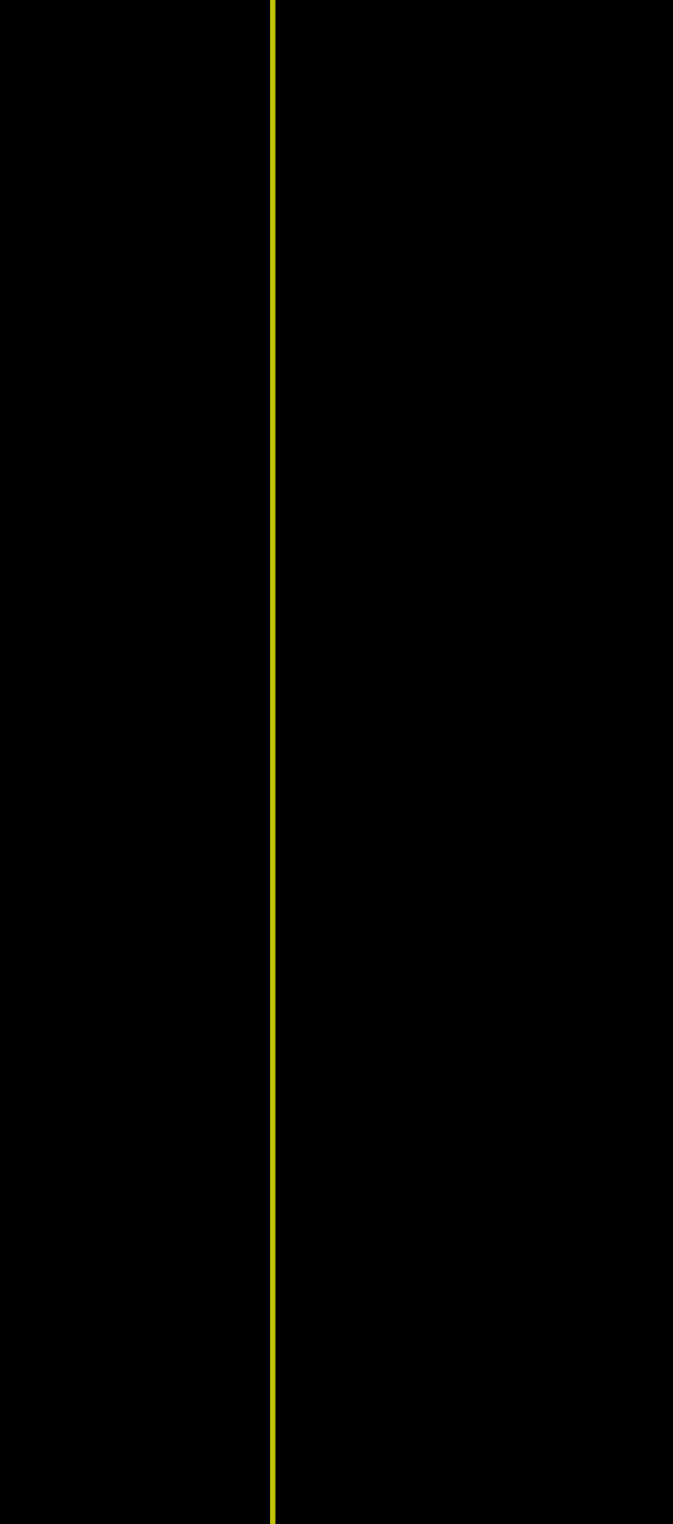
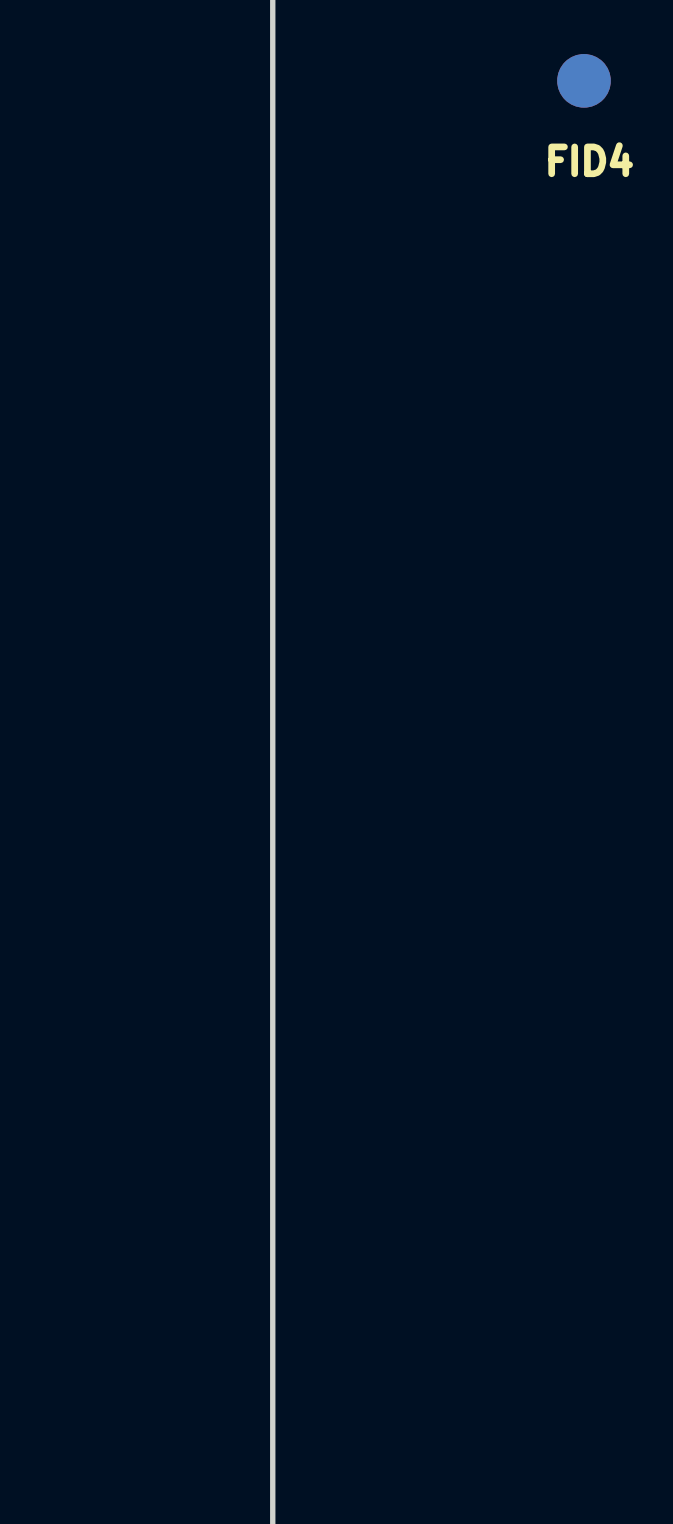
FID4: none -> (583, 80)

